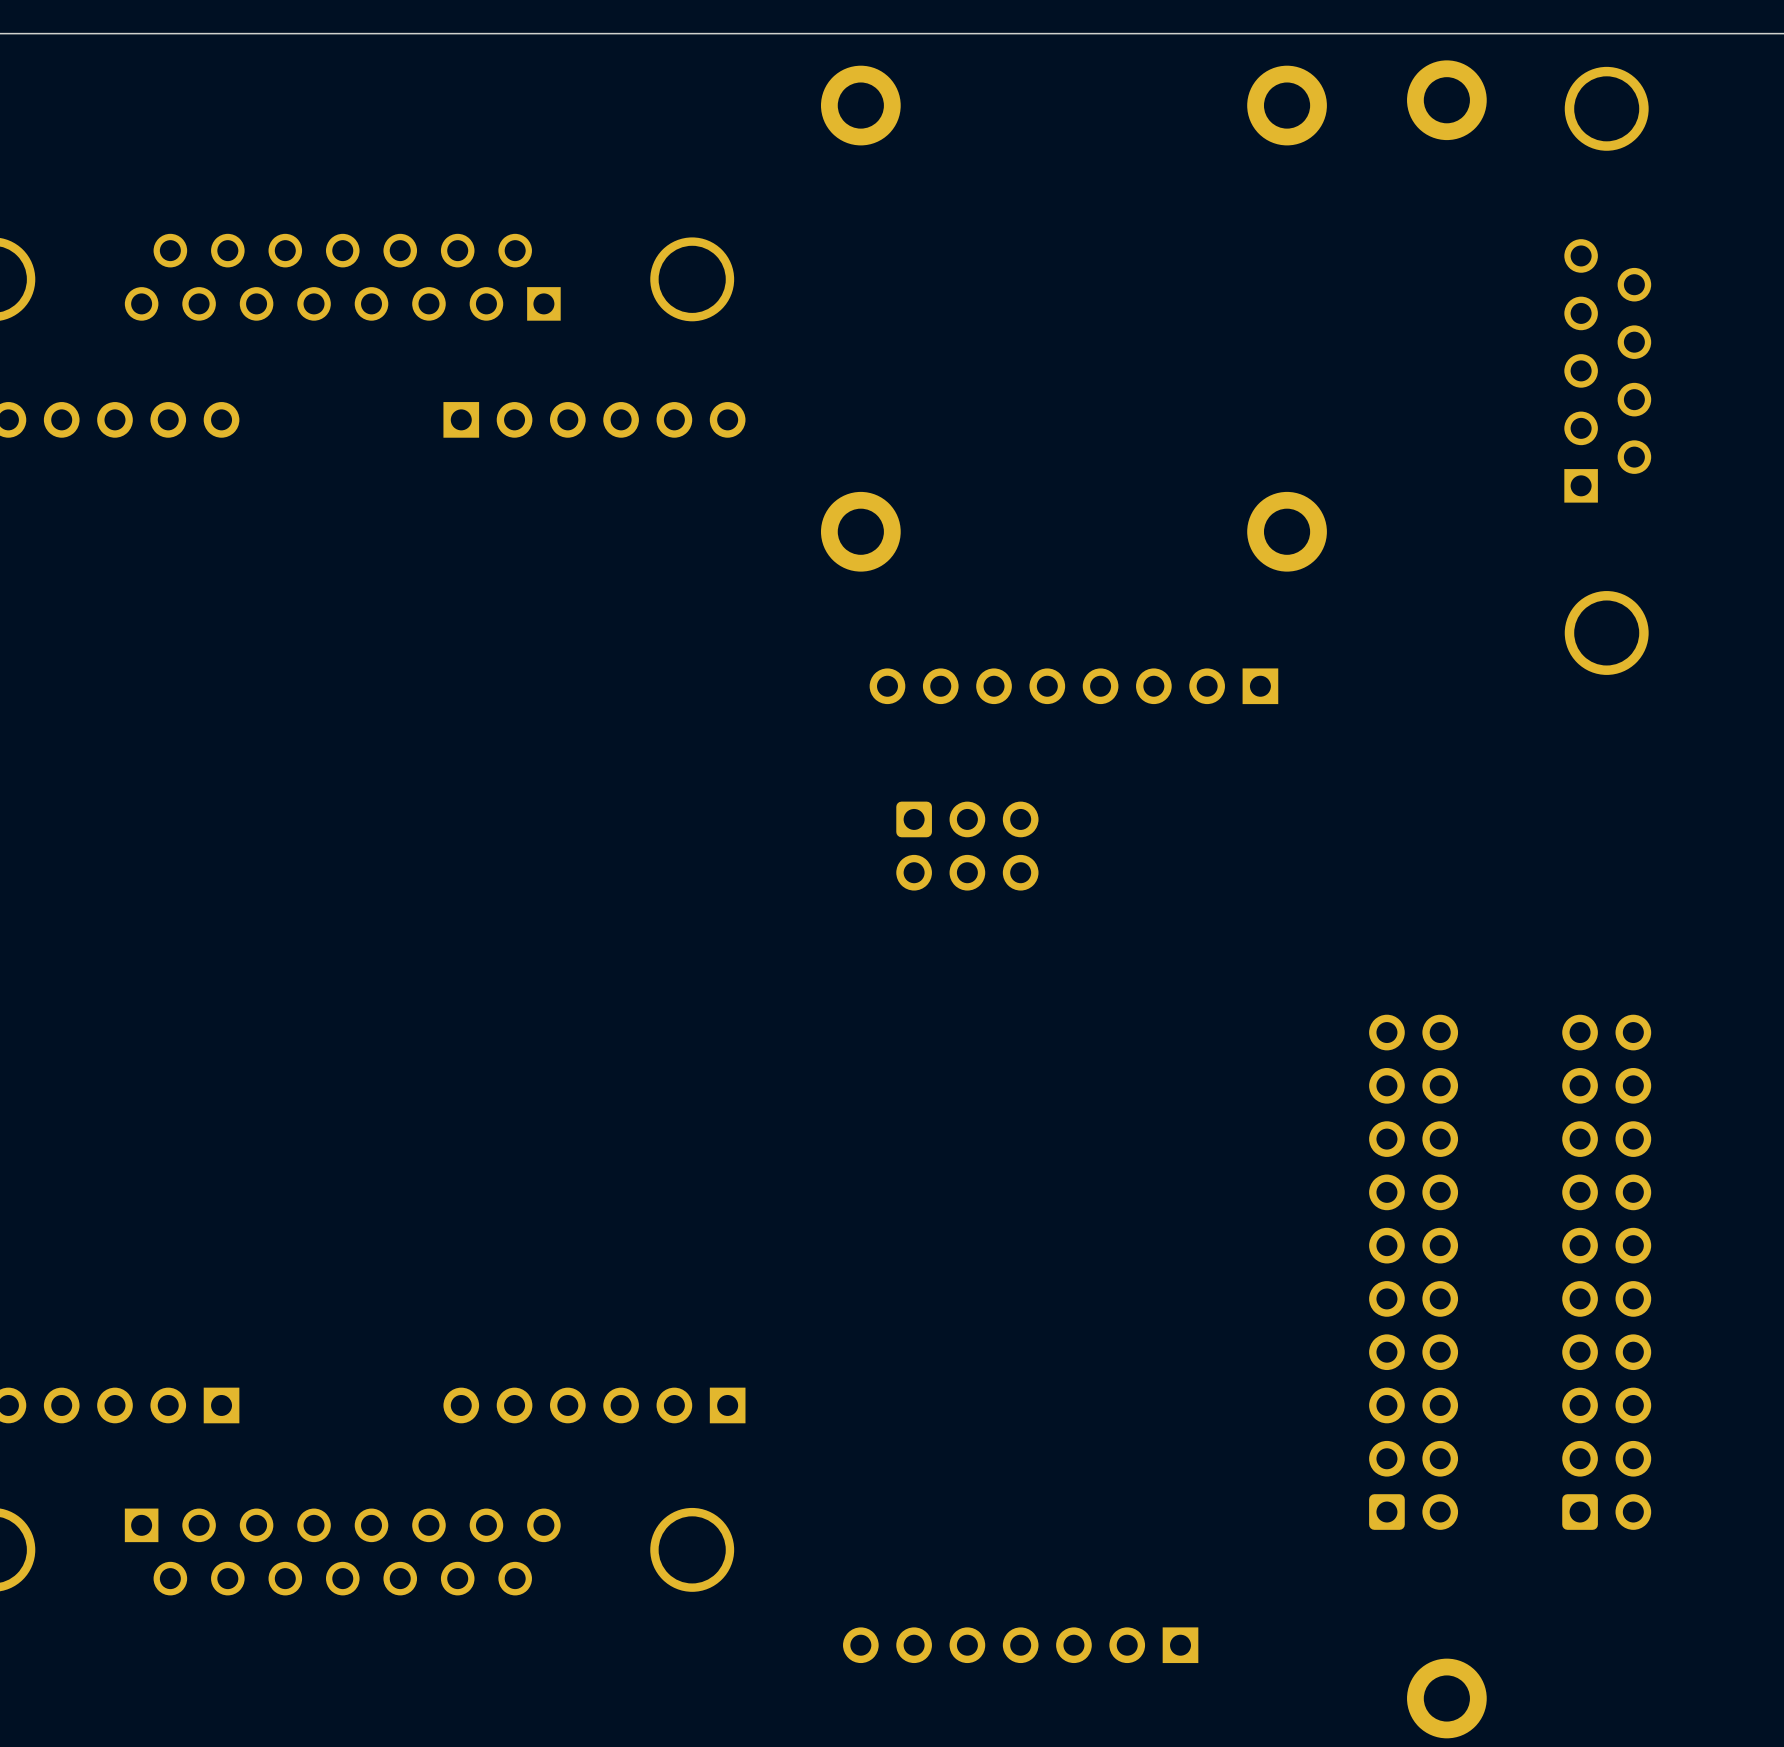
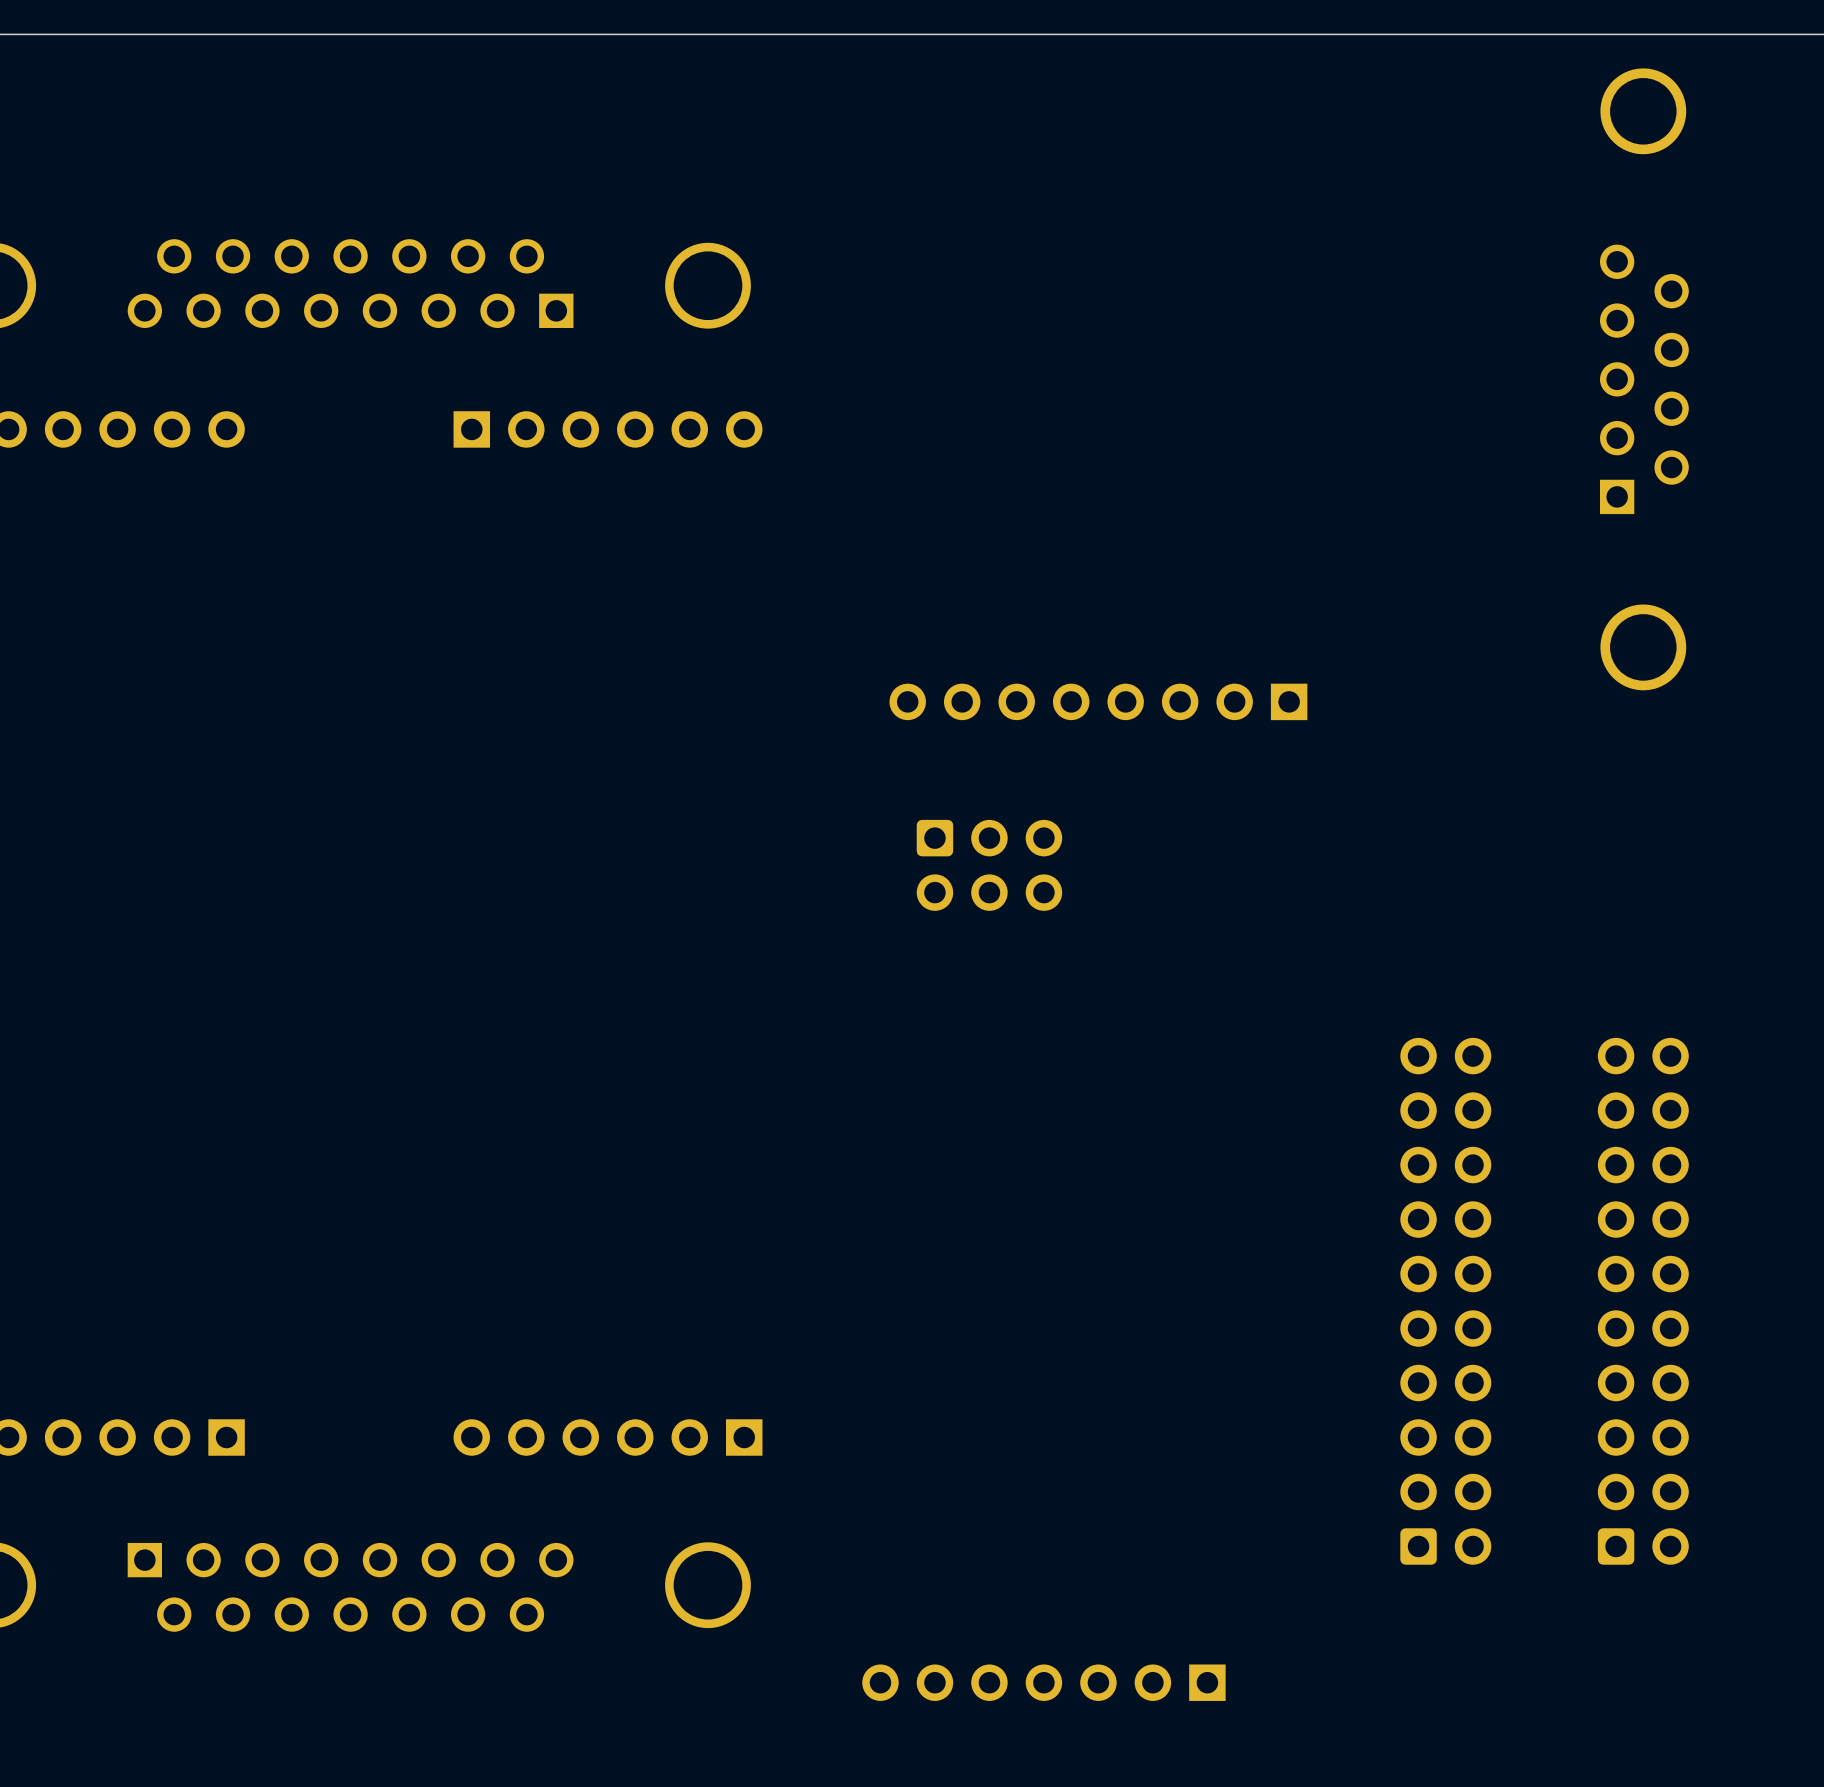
part: (1446, 100) -> none
part: (860, 105) -> none
part: (1287, 105) -> none
part: (860, 531) -> none
part: (1287, 531) -> none
part: (1446, 1698) -> none

